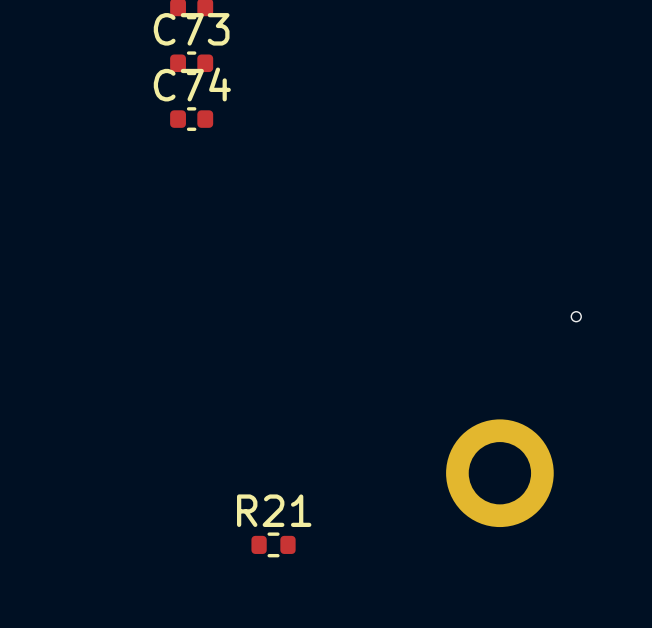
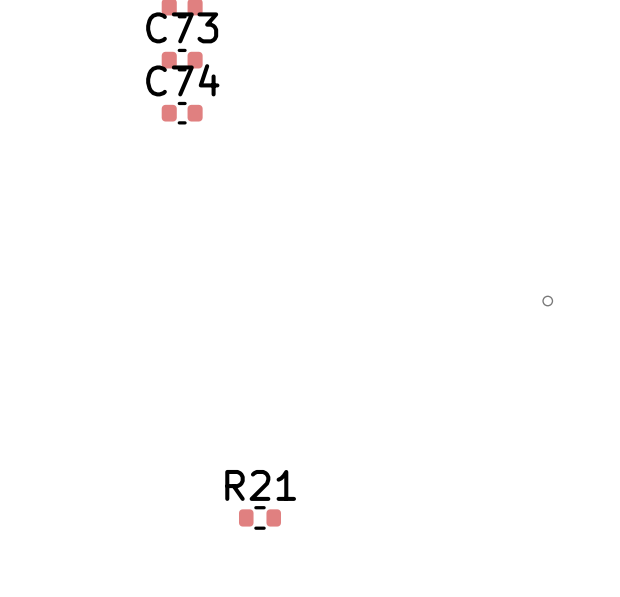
part: (499, 473) -> none

